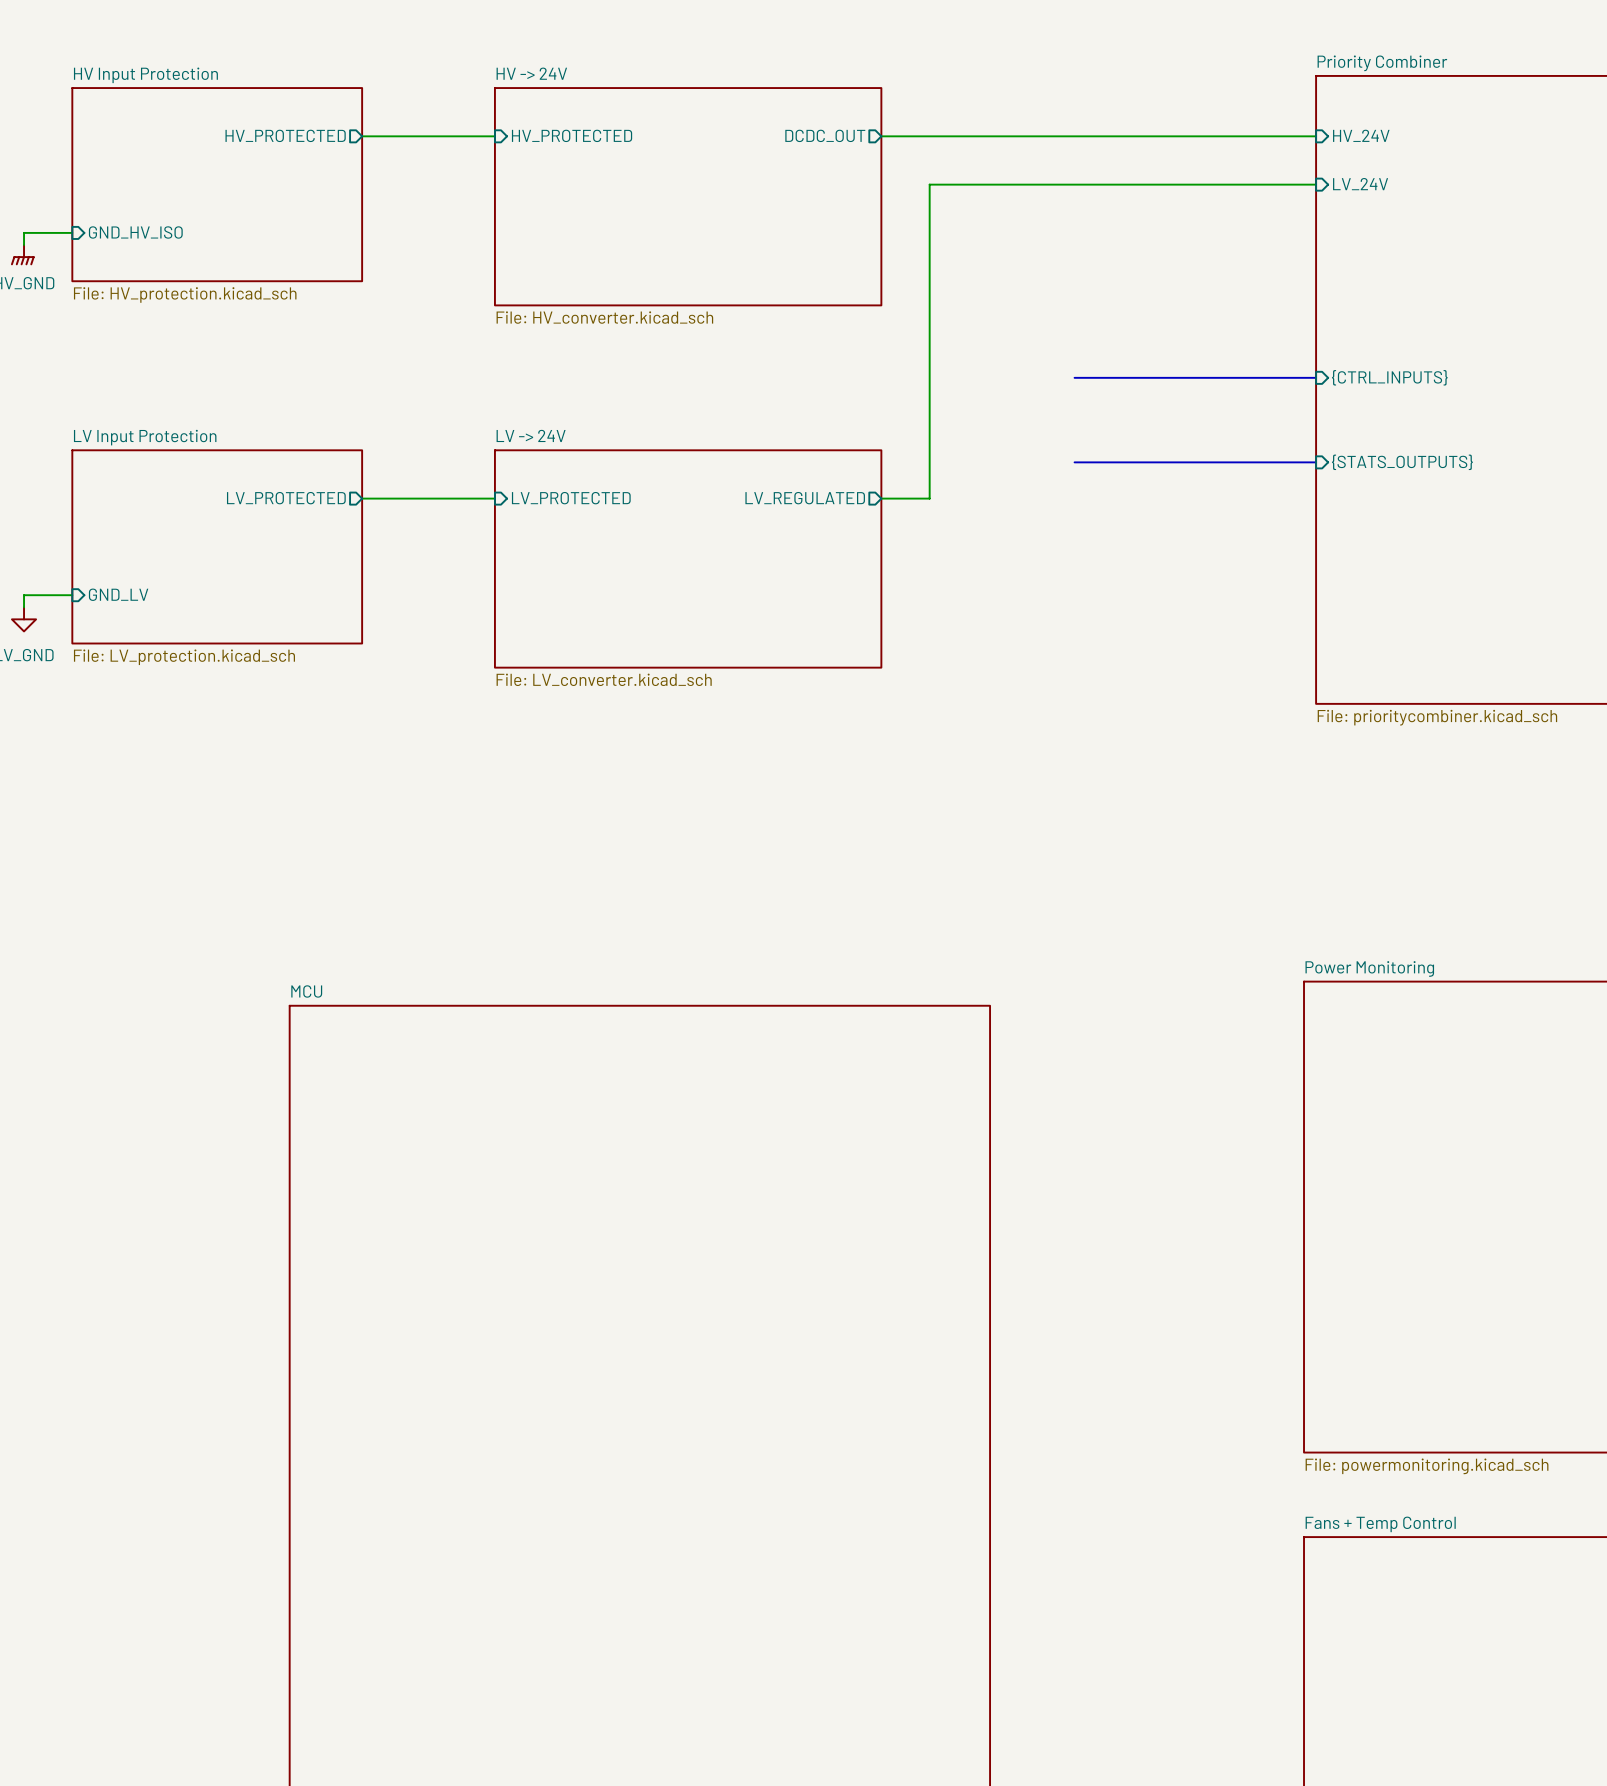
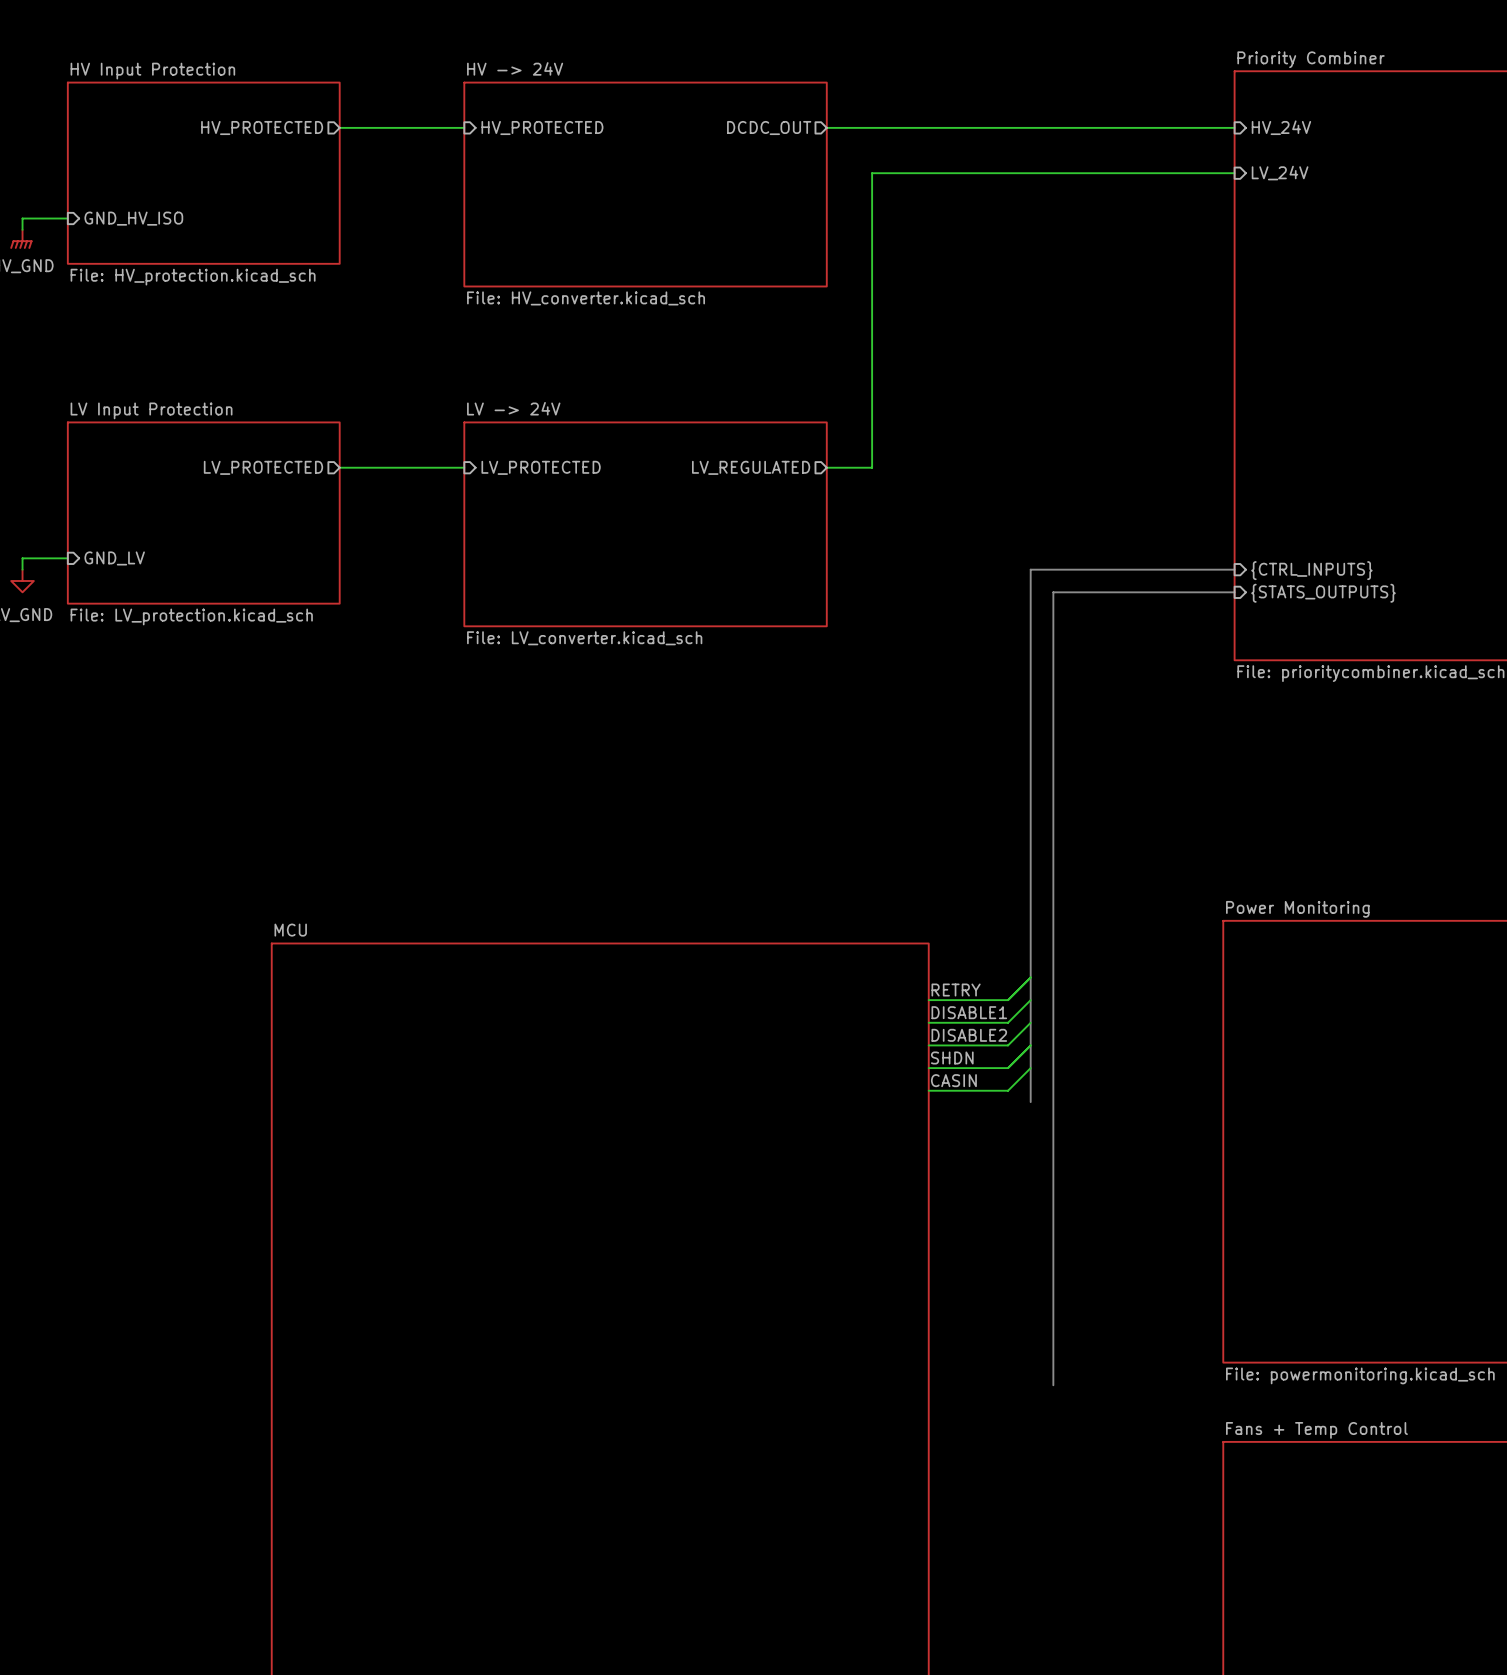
bus: (1074, 377) (1316, 377) -> none
sheet pin position: {CTRL_INPUTS} (1389, 377) -> {CTRL_INPUTS} (1311, 570)
bus: (1074, 462) (1316, 462) -> none
sheet pin position: {STATS_OUTPUTS} (1402, 462) -> {STATS_OUTPUTS} (1323, 593)
bus: none -> (1234, 569) (1030, 569) (1030, 1102)
bus: none -> (1234, 592) (1053, 592) (1053, 1385)
wire: none -> (1030, 977) (1008, 1000) (928, 1000)
label: none -> RETRY (956, 990)
wire: none -> (1030, 1000) (1008, 1022) (928, 1022)
label: none -> DISABLE1 (969, 1012)
wire: none -> (1030, 1022) (1008, 1045) (928, 1045)
label: none -> DISABLE2 (969, 1035)
wire: none -> (1030, 1045) (1008, 1068) (928, 1068)
label: none -> SHDN (952, 1057)
wire: none -> (1030, 1068) (1008, 1090) (928, 1090)
label: none -> CASIN (953, 1080)

